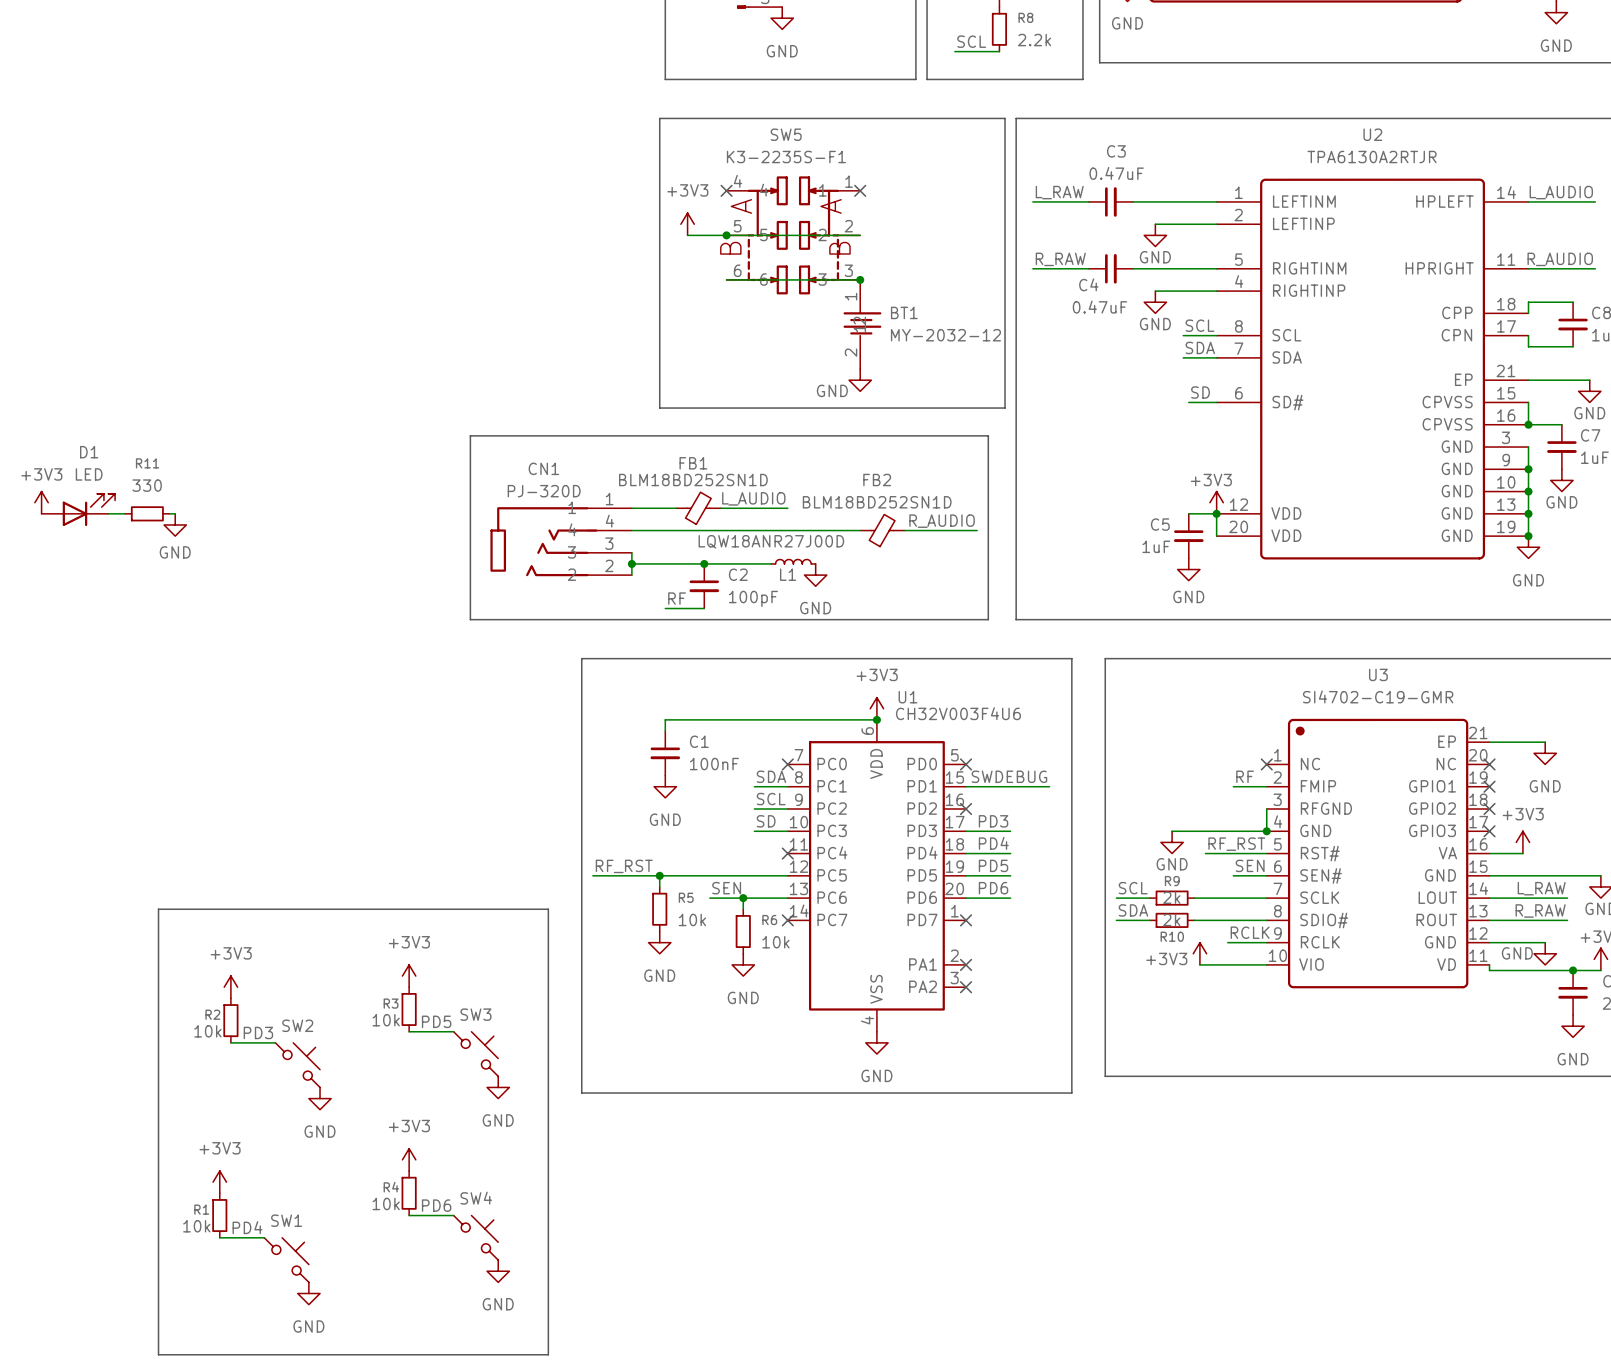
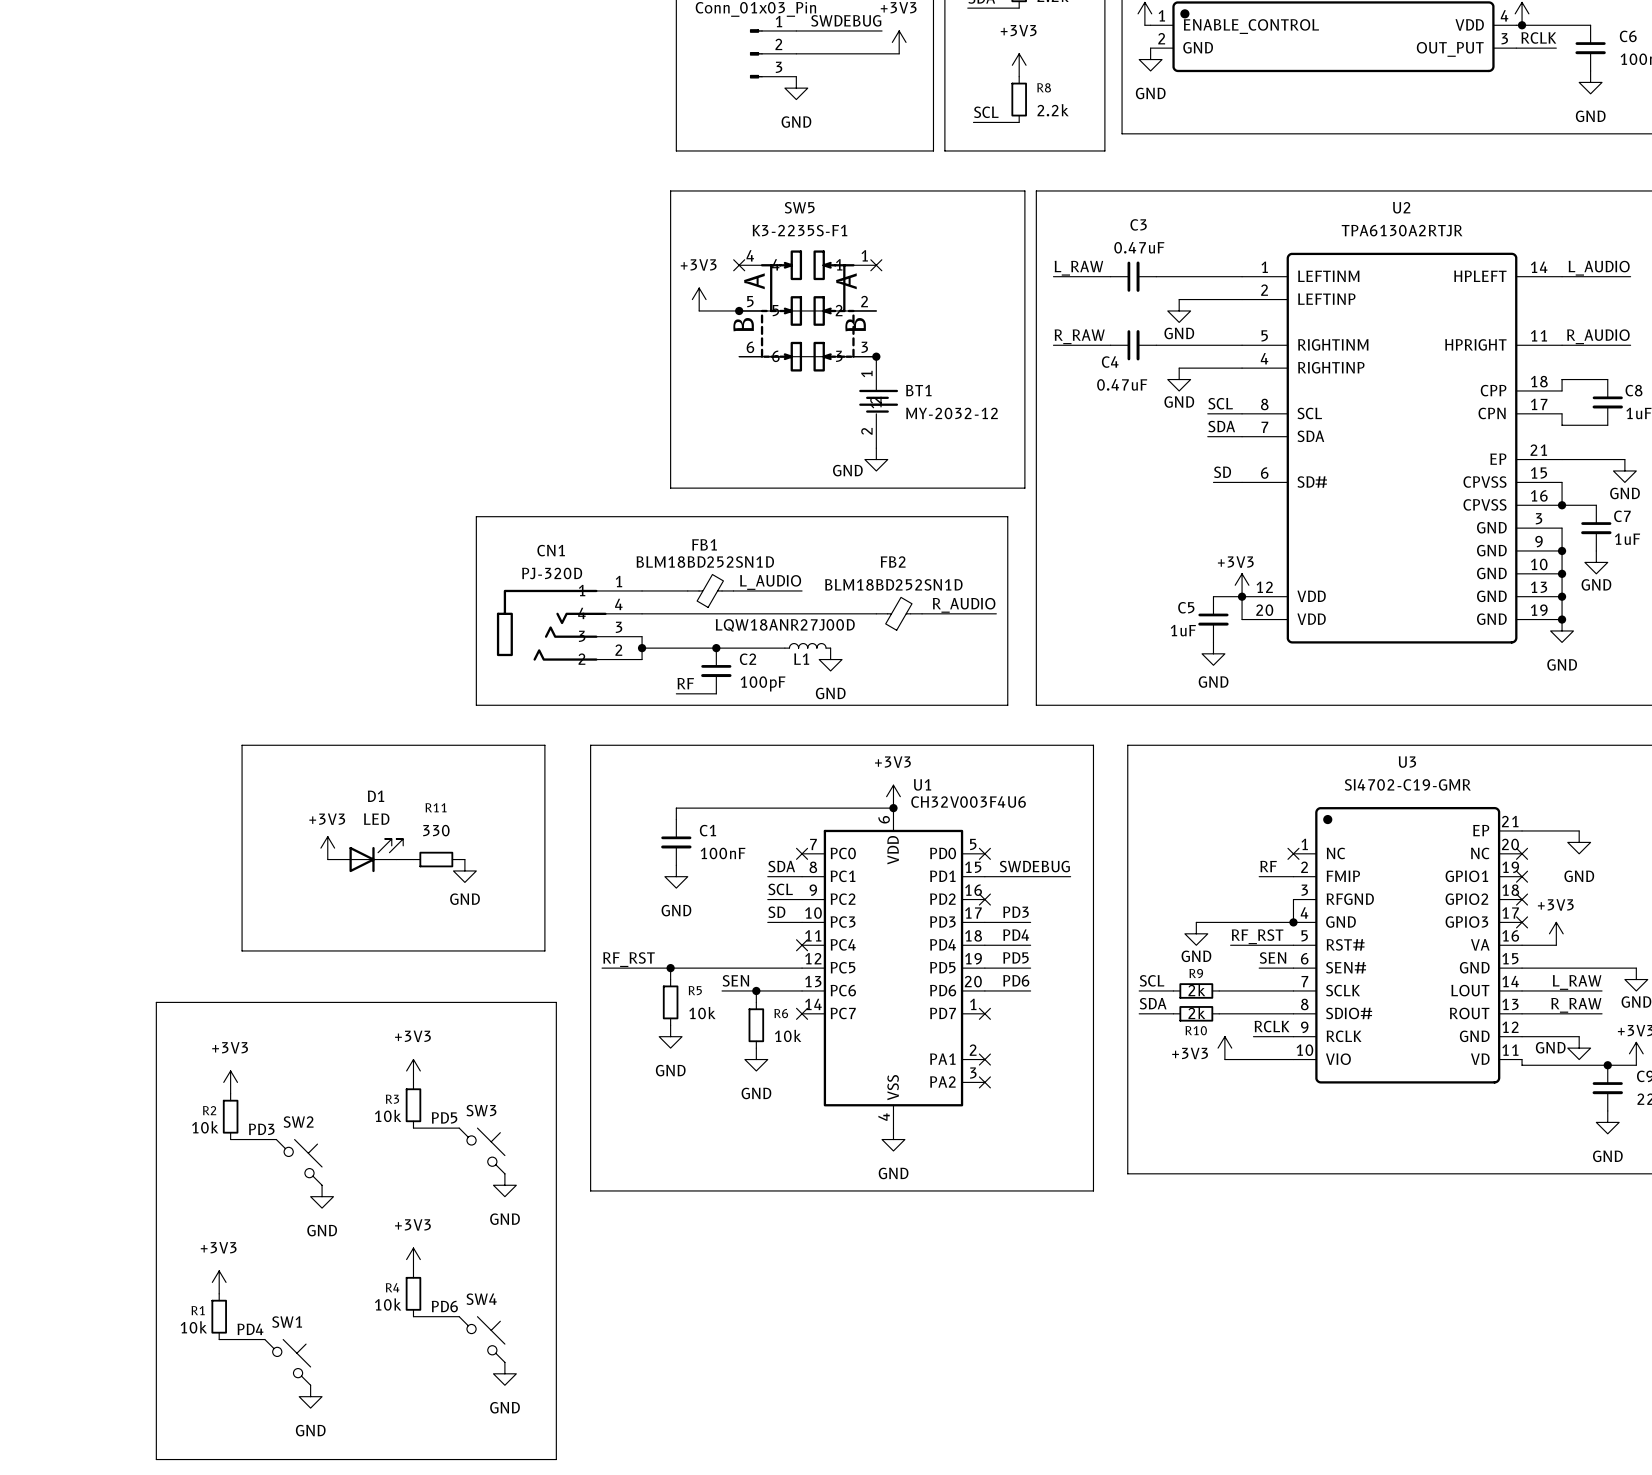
power symbol: +3V3 (41, 502) -> none
D1 position: (78, 509) -> (365, 855)
wire: (108, 513) (125, 513) -> none
R11 position: (147, 513) -> (436, 859)
wire: (169, 513) (175, 513) -> none
power symbol: GND (175, 524) -> none
line: none -> (242, 745) (544, 745) (544, 950) (242, 950) (242, 745)
power symbol: none -> +3V3 (327, 848)
wire: none -> (396, 859) (413, 859)
wire: none -> (459, 859) (464, 859)
power symbol: none -> GND (464, 870)

